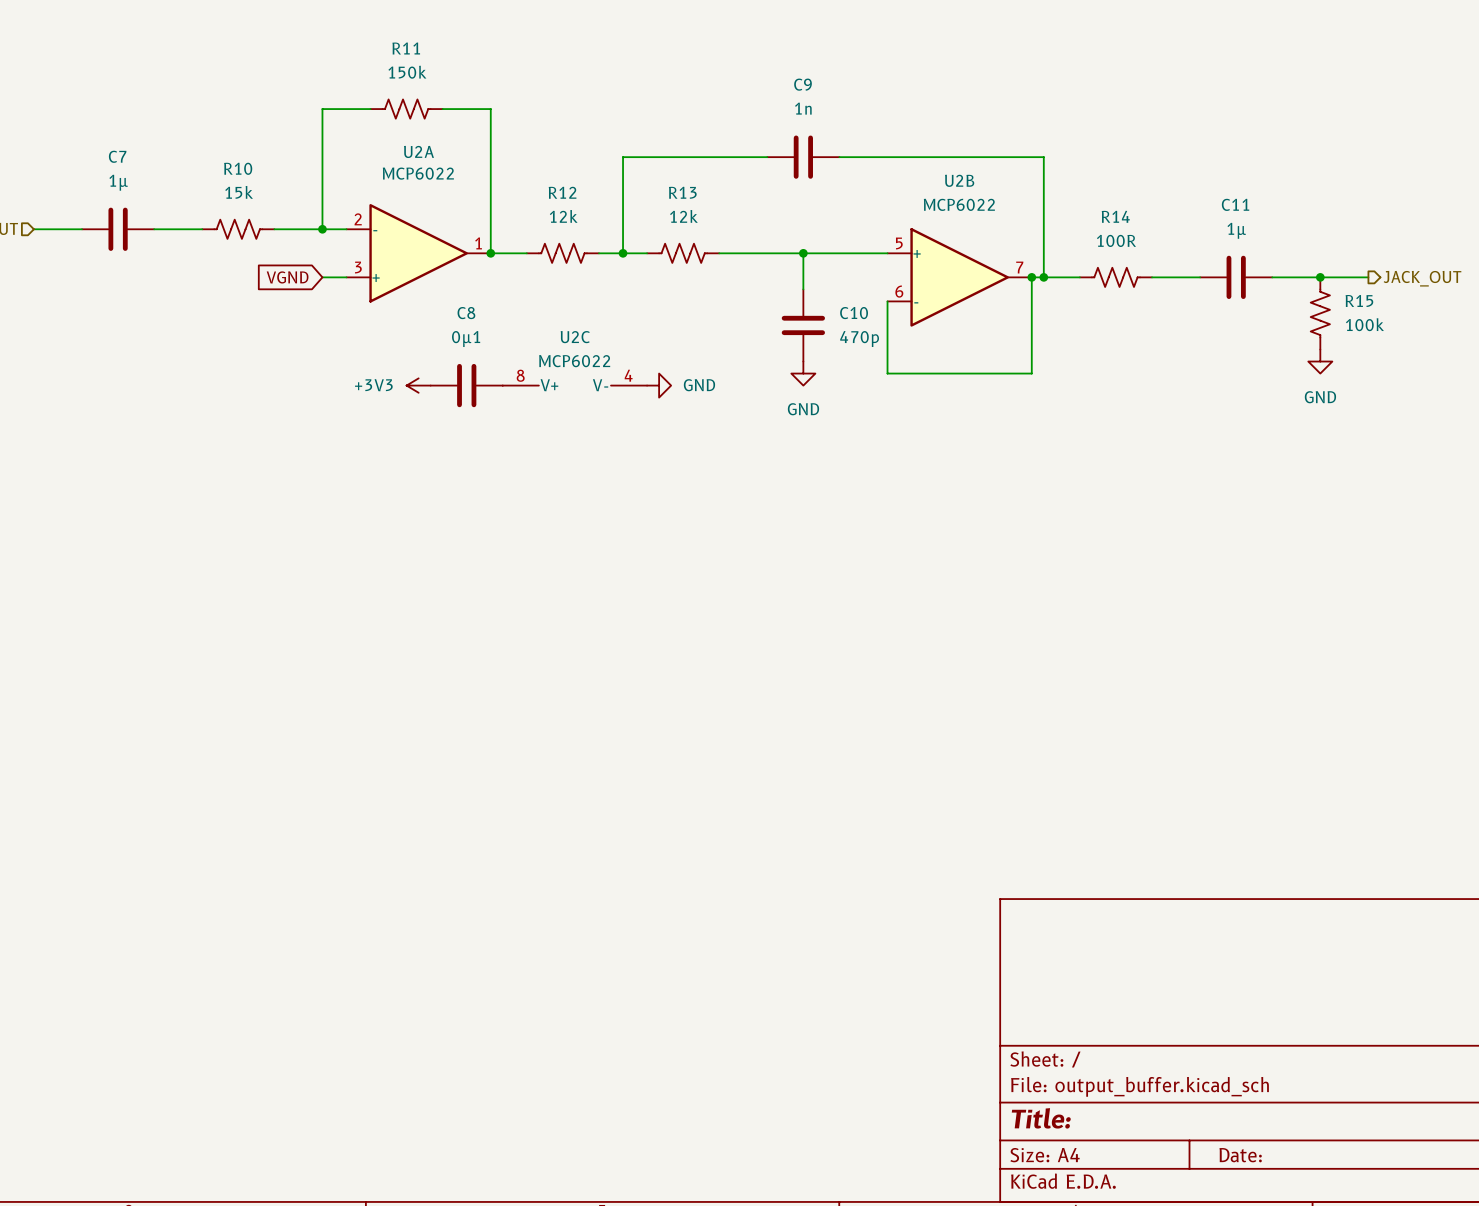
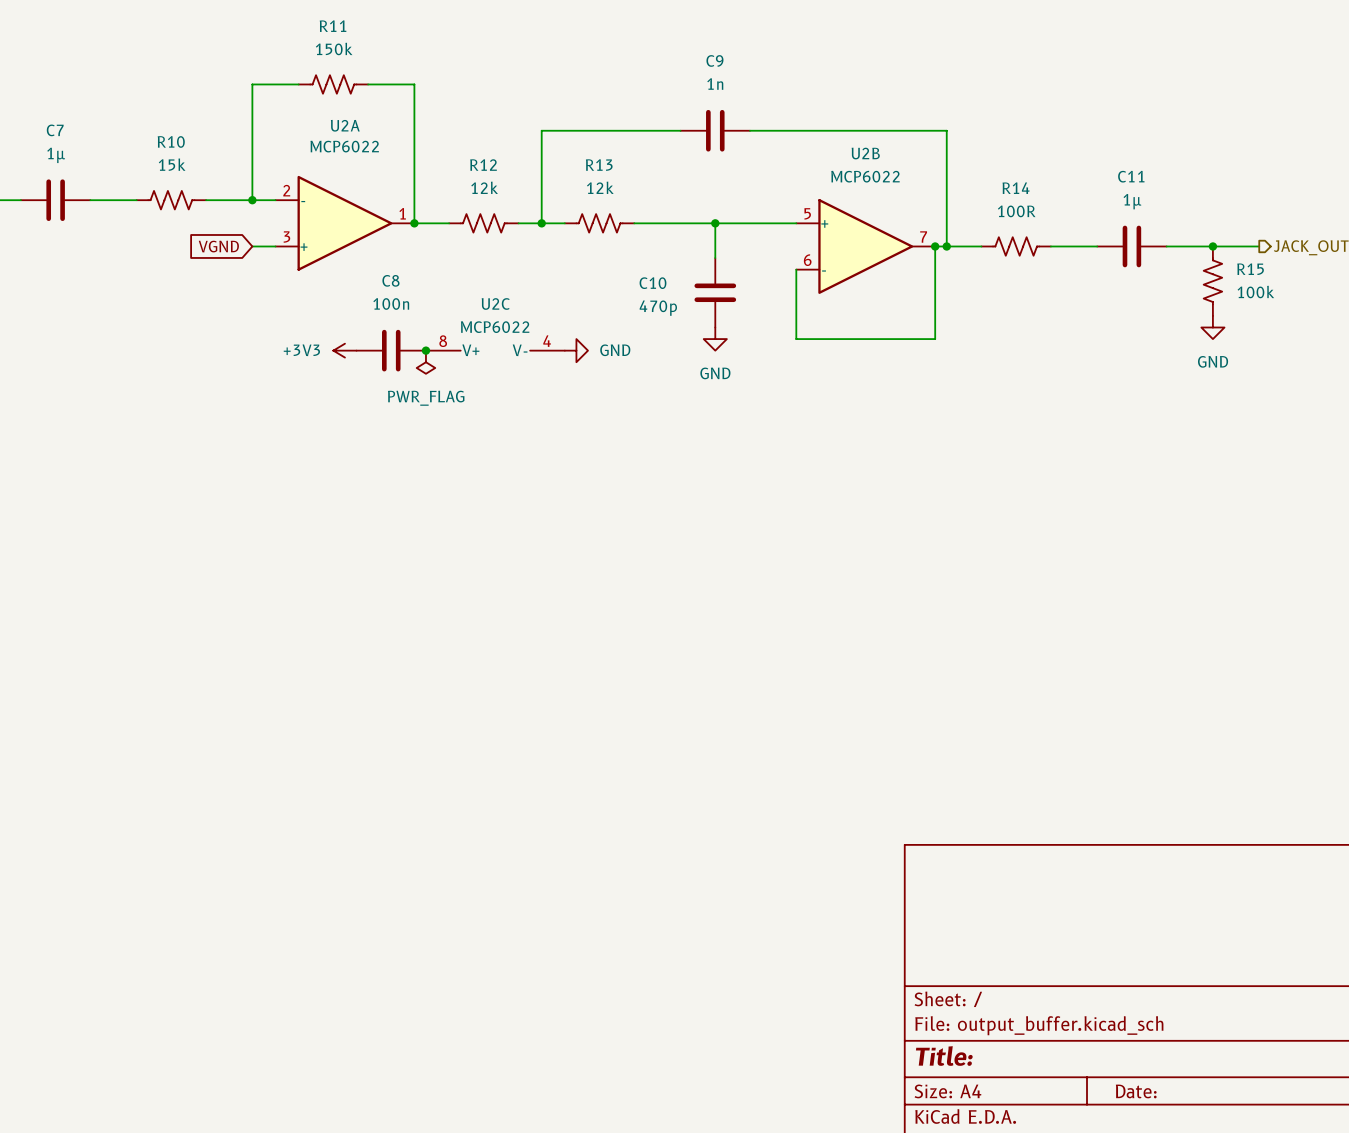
C10 name position: C10 (854, 313) -> C10 (653, 283)
C8 value: 0µ1 (466, 339) -> 100n (391, 303)
C10 value position: 470p (859, 339) -> 470p (658, 308)
junction: none -> (425, 350)
power symbol: none -> PWR_FLAG (425, 362)

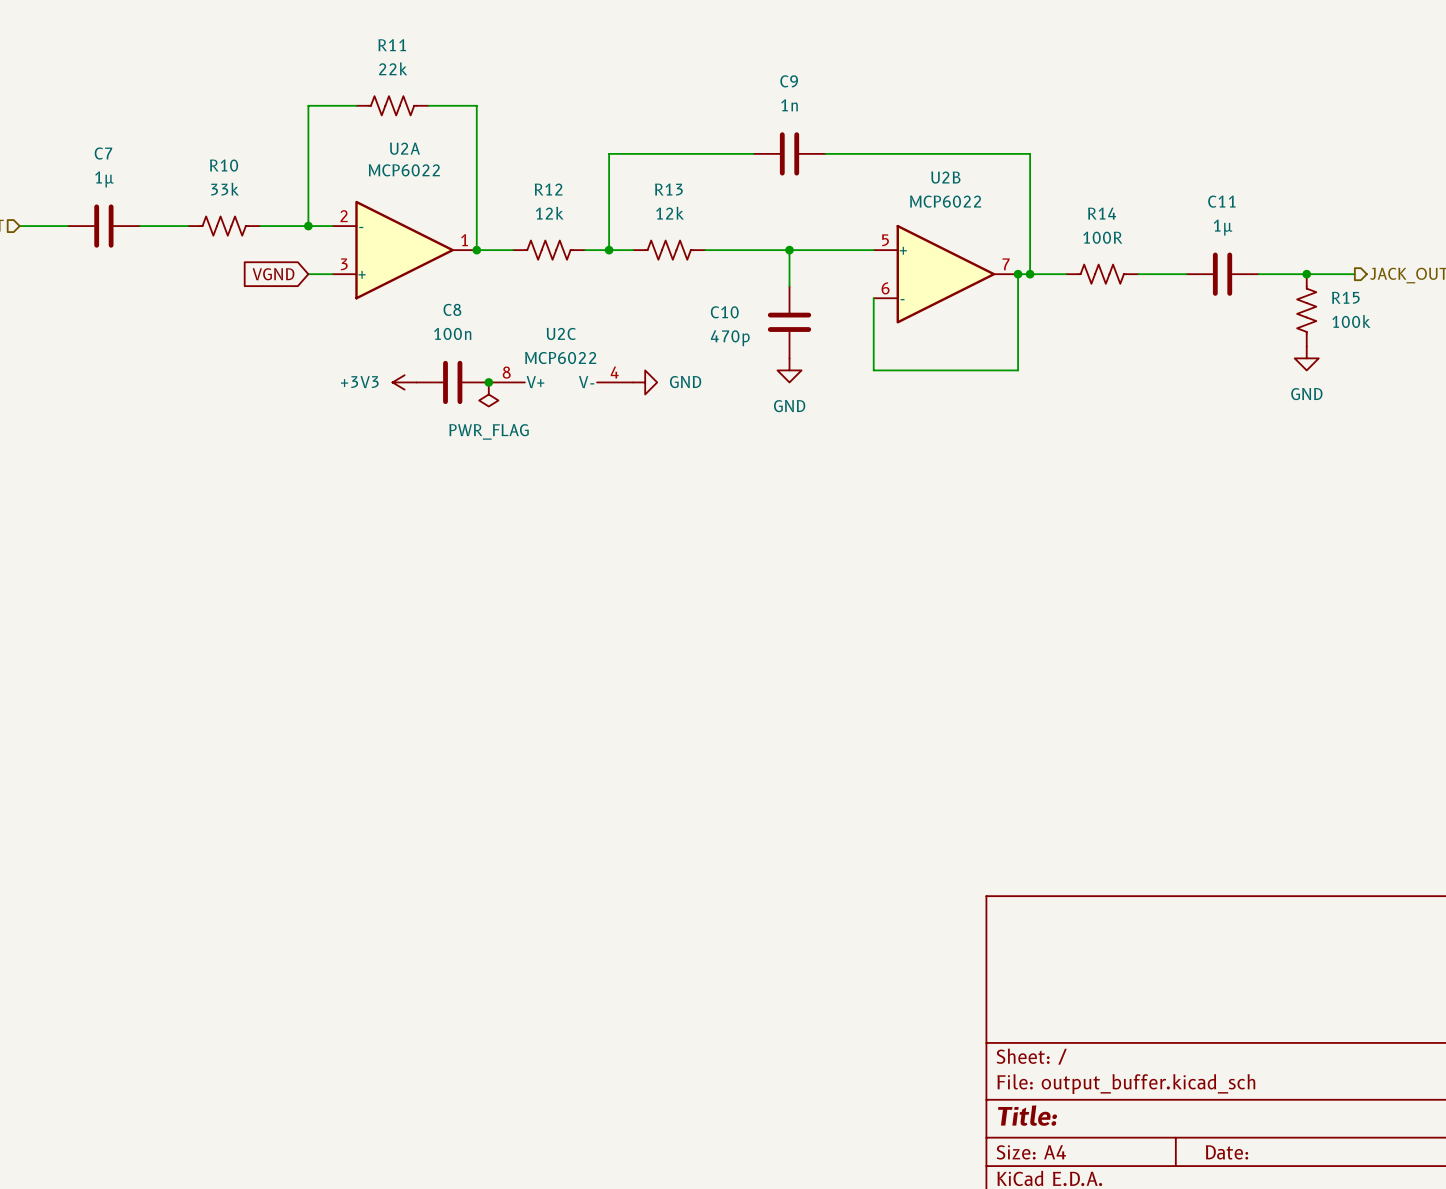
R11 value: 150k (334, 48) -> 22k (393, 68)
R10 value: 15k (172, 164) -> 33k (224, 189)

